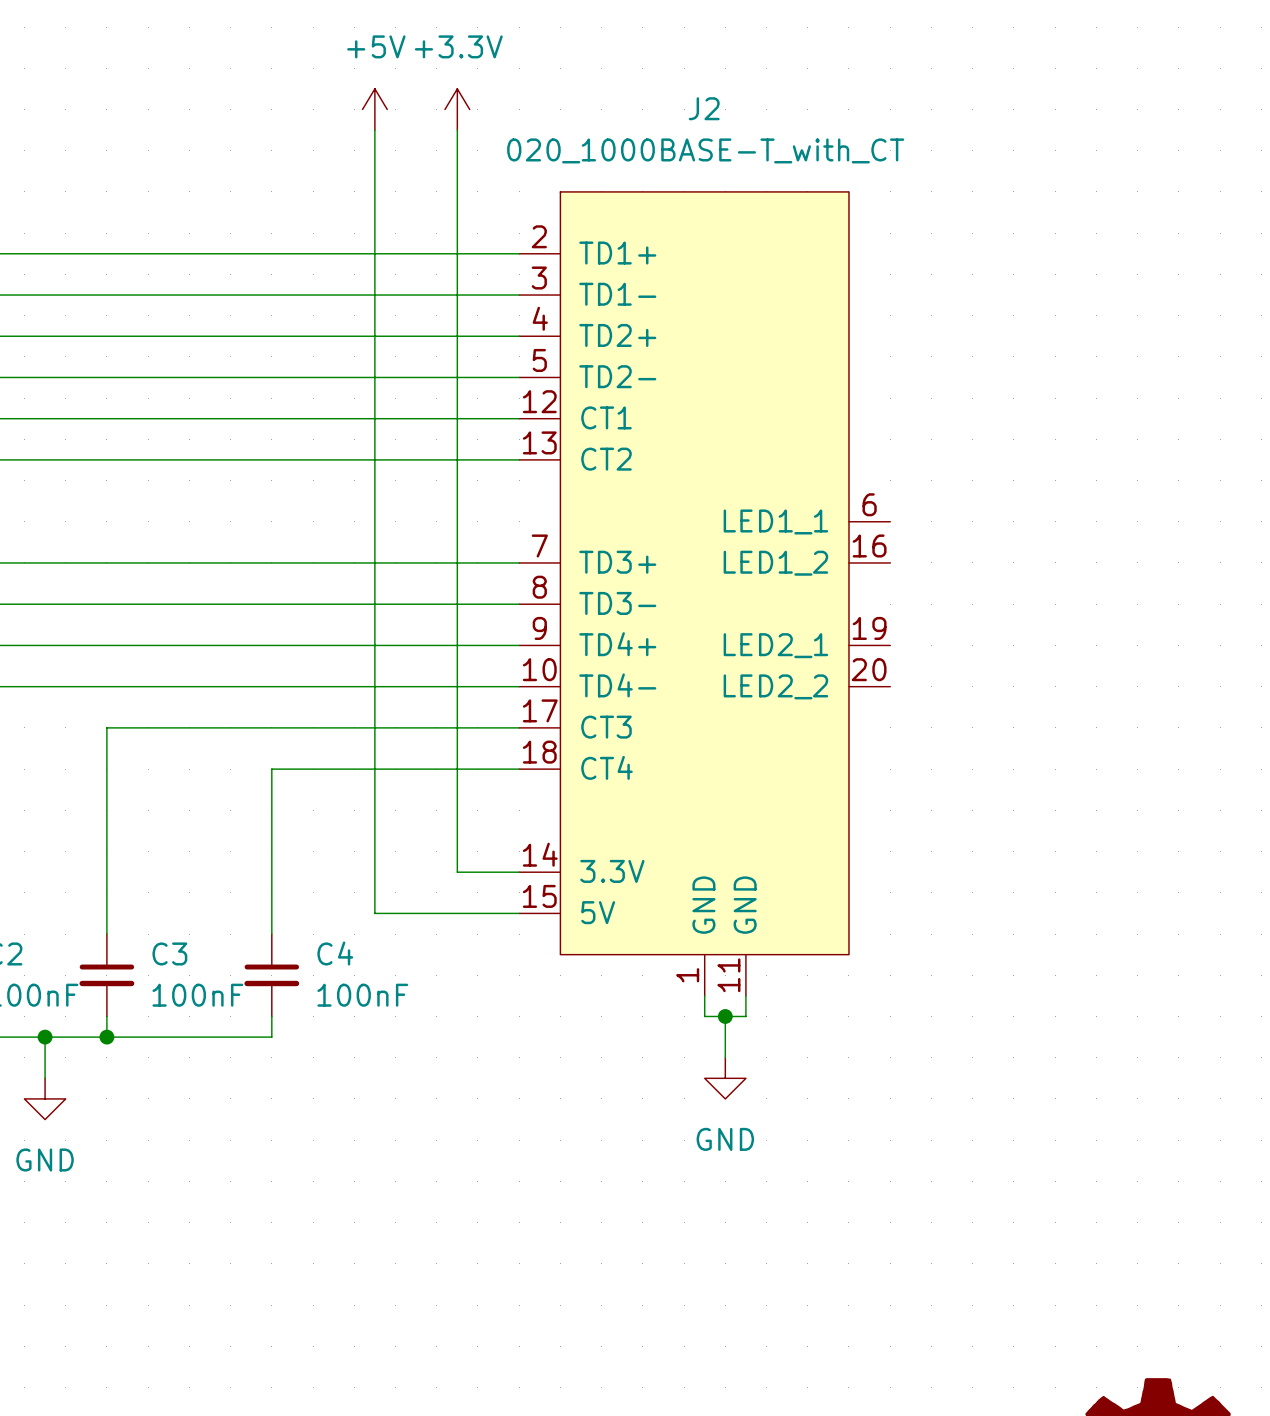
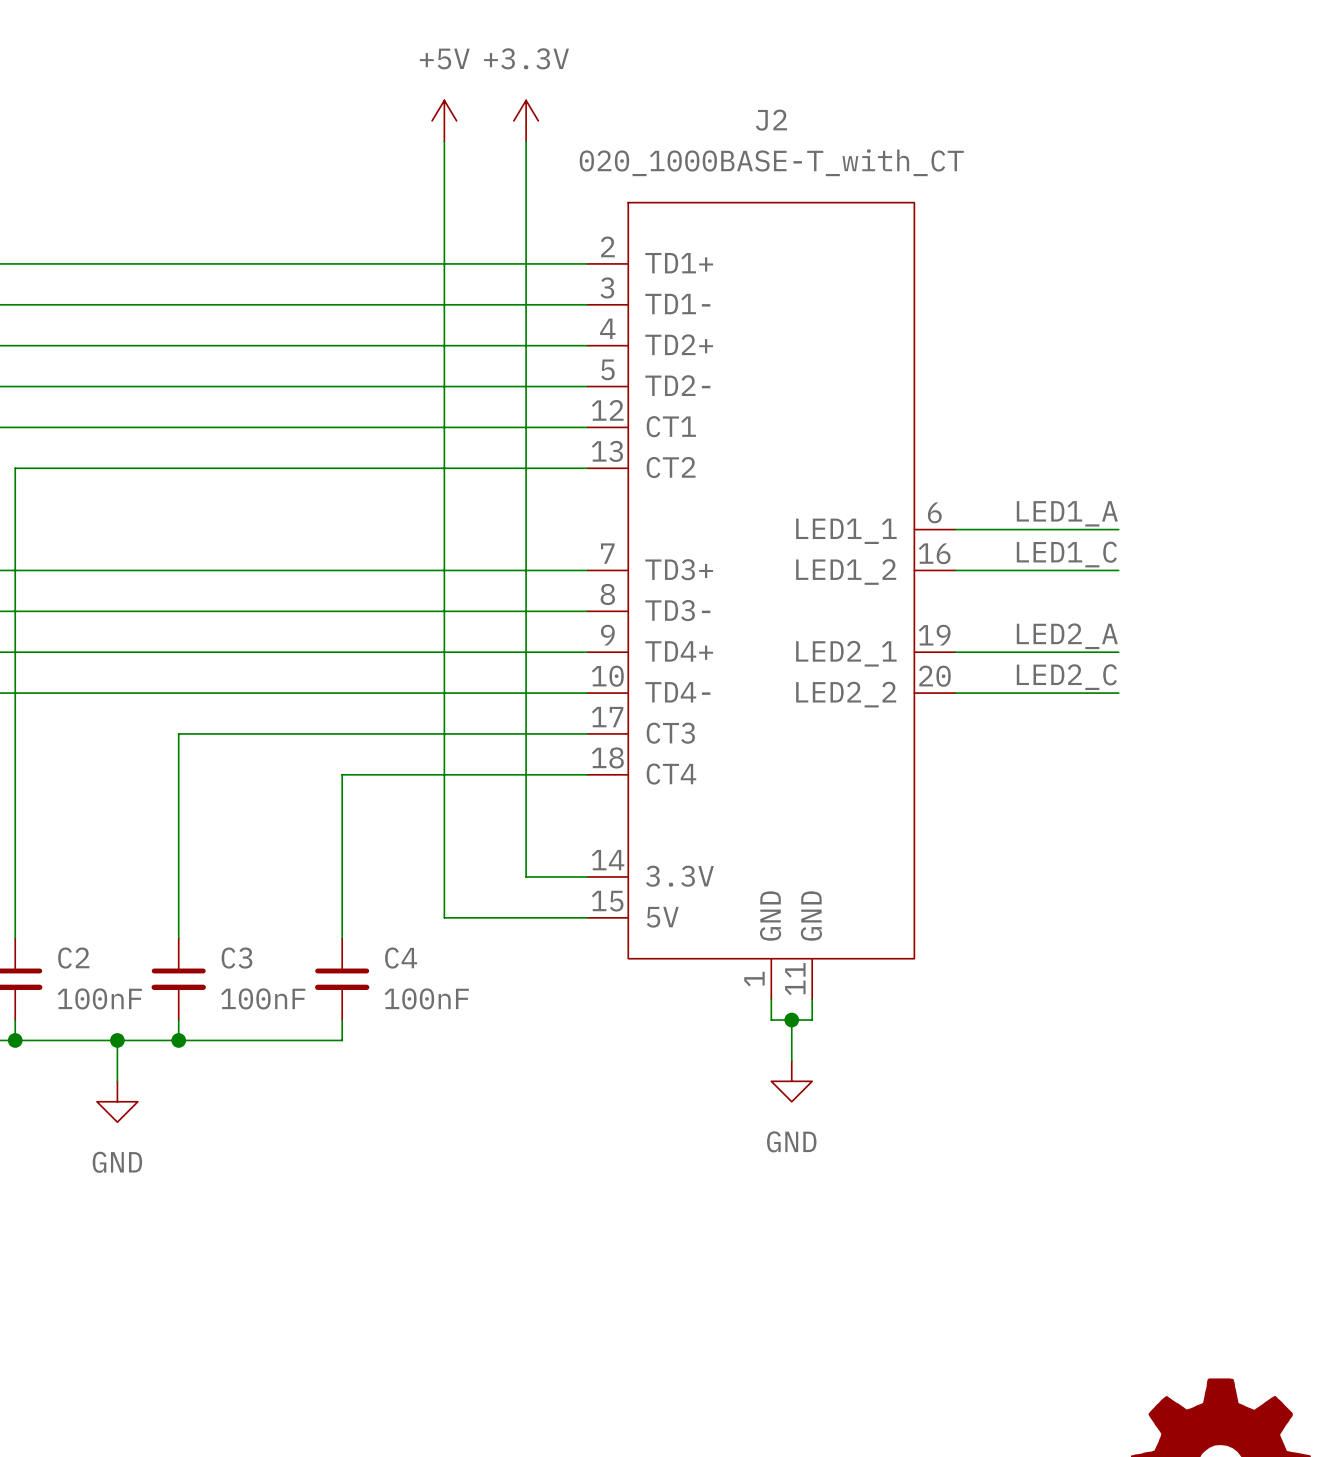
label: none -> LED1_A (1067, 513)
wire: none -> (955, 529) (1118, 529)
label: none -> LED1_C (1066, 554)
wire: none -> (955, 570) (1118, 570)
label: none -> LED2_A (1067, 636)
wire: none -> (955, 652) (1118, 652)
label: none -> LED2_C (1066, 677)
wire: none -> (955, 693) (1118, 693)

